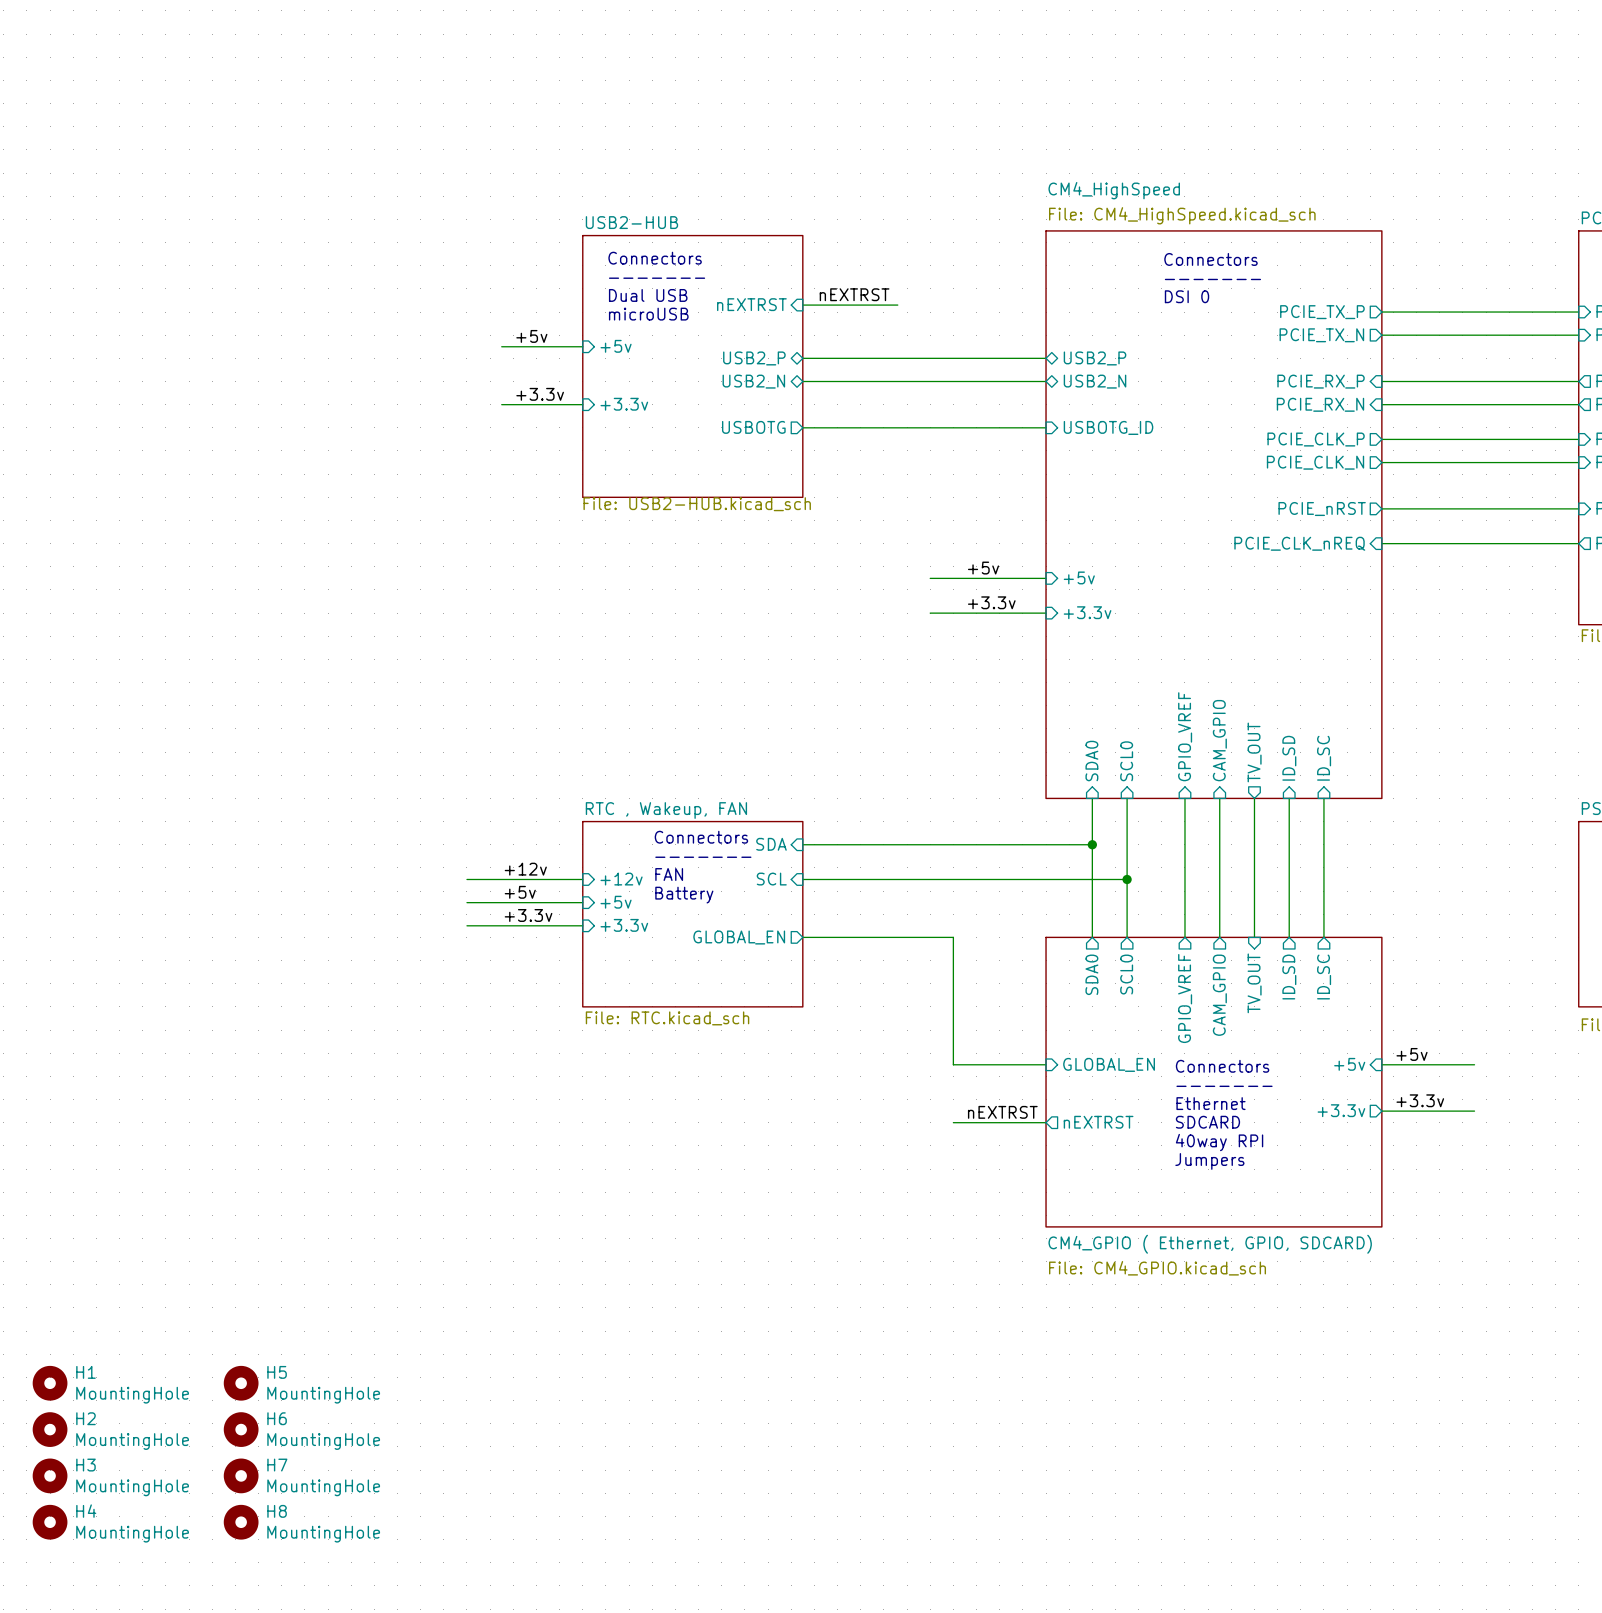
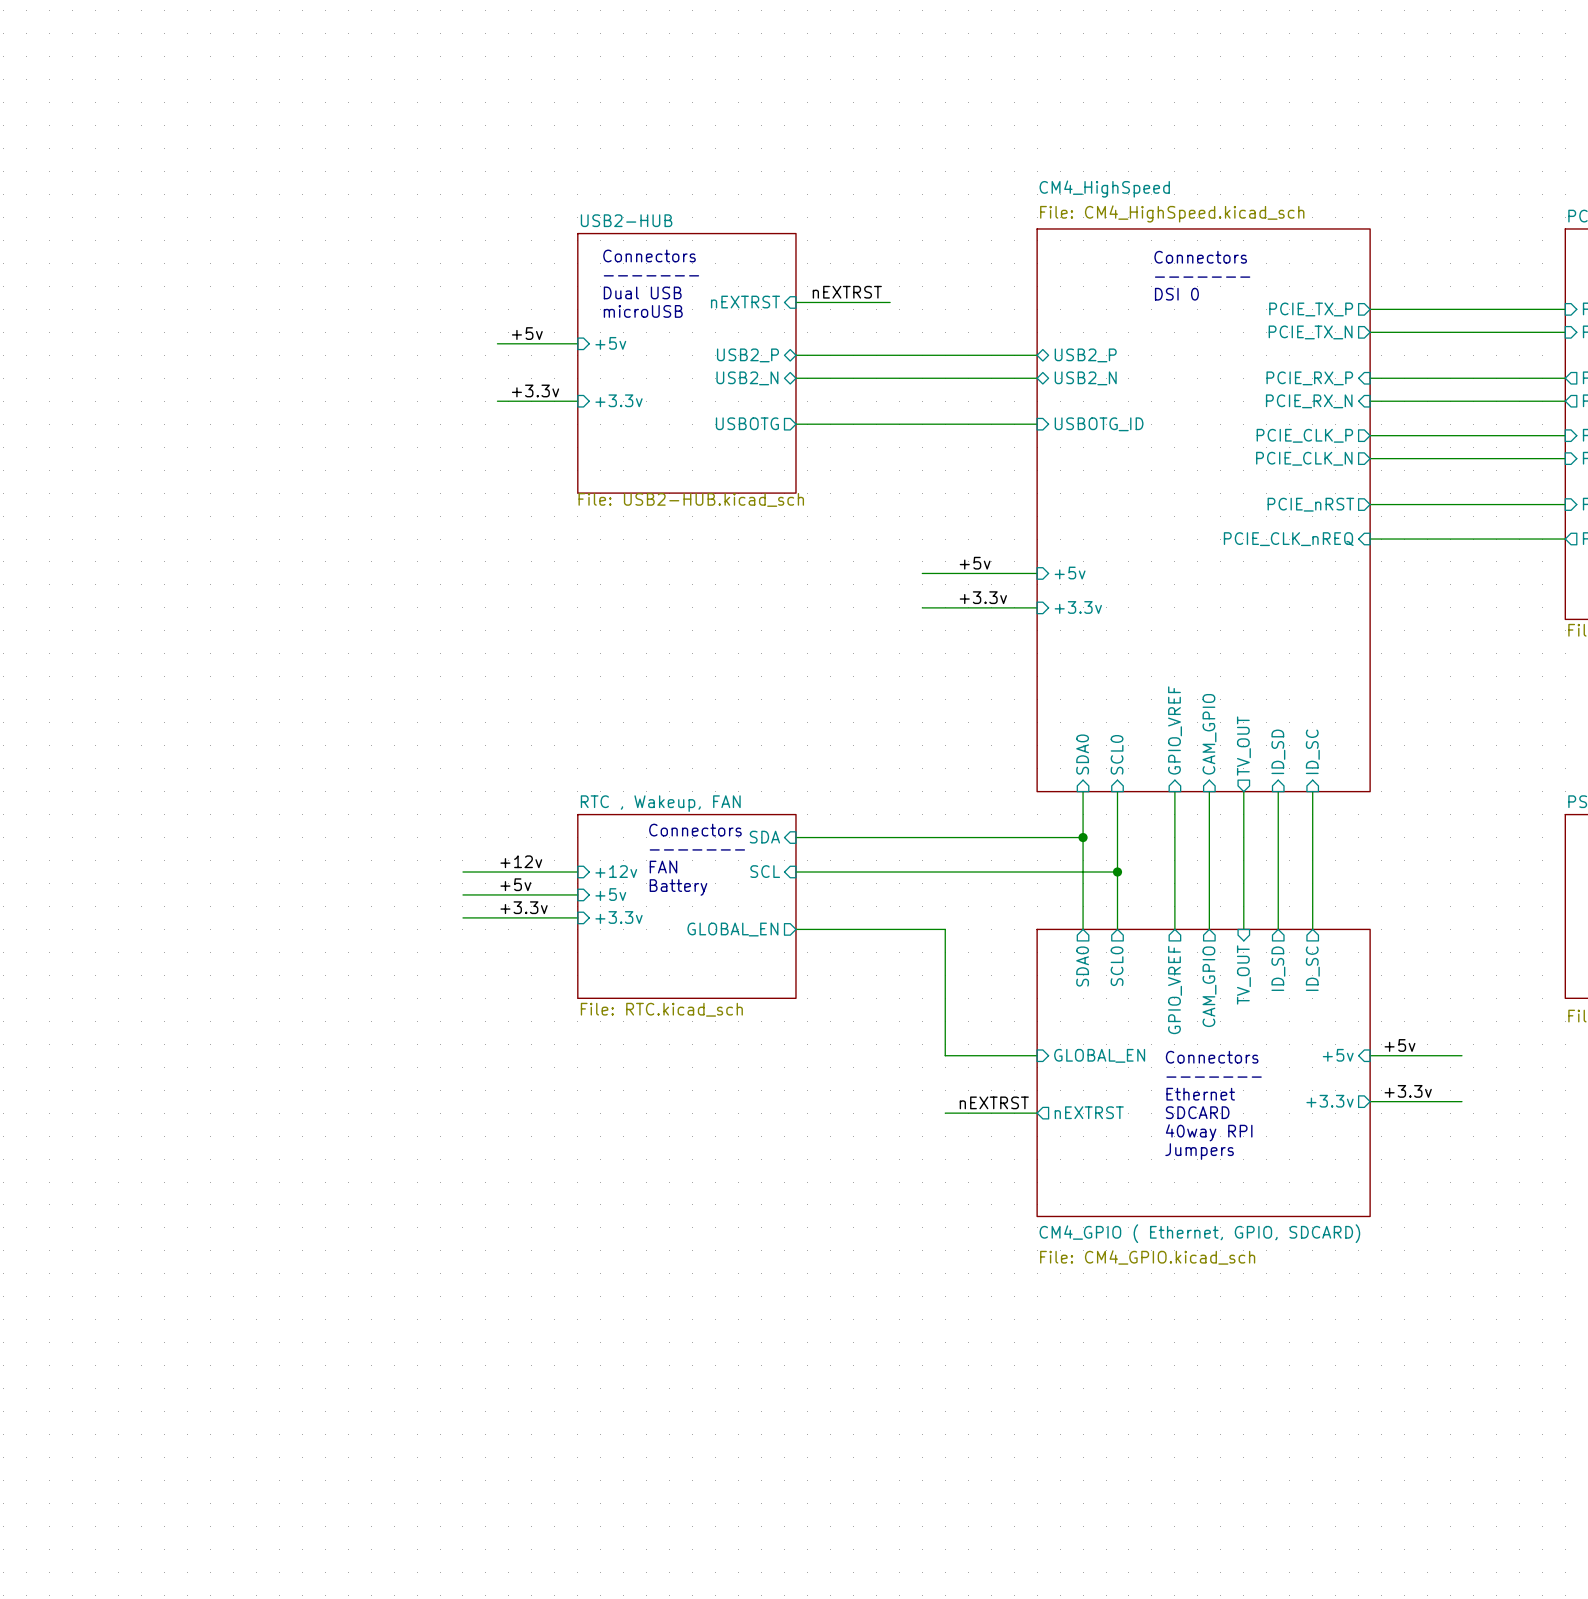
H1: MountingHole (50, 1383) -> none
H5: MountingHole (241, 1383) -> none
H2: MountingHole (50, 1429) -> none
H6: MountingHole (241, 1429) -> none
H3: MountingHole (50, 1475) -> none
H7: MountingHole (241, 1475) -> none
H4: MountingHole (50, 1522) -> none
H8: MountingHole (241, 1522) -> none

